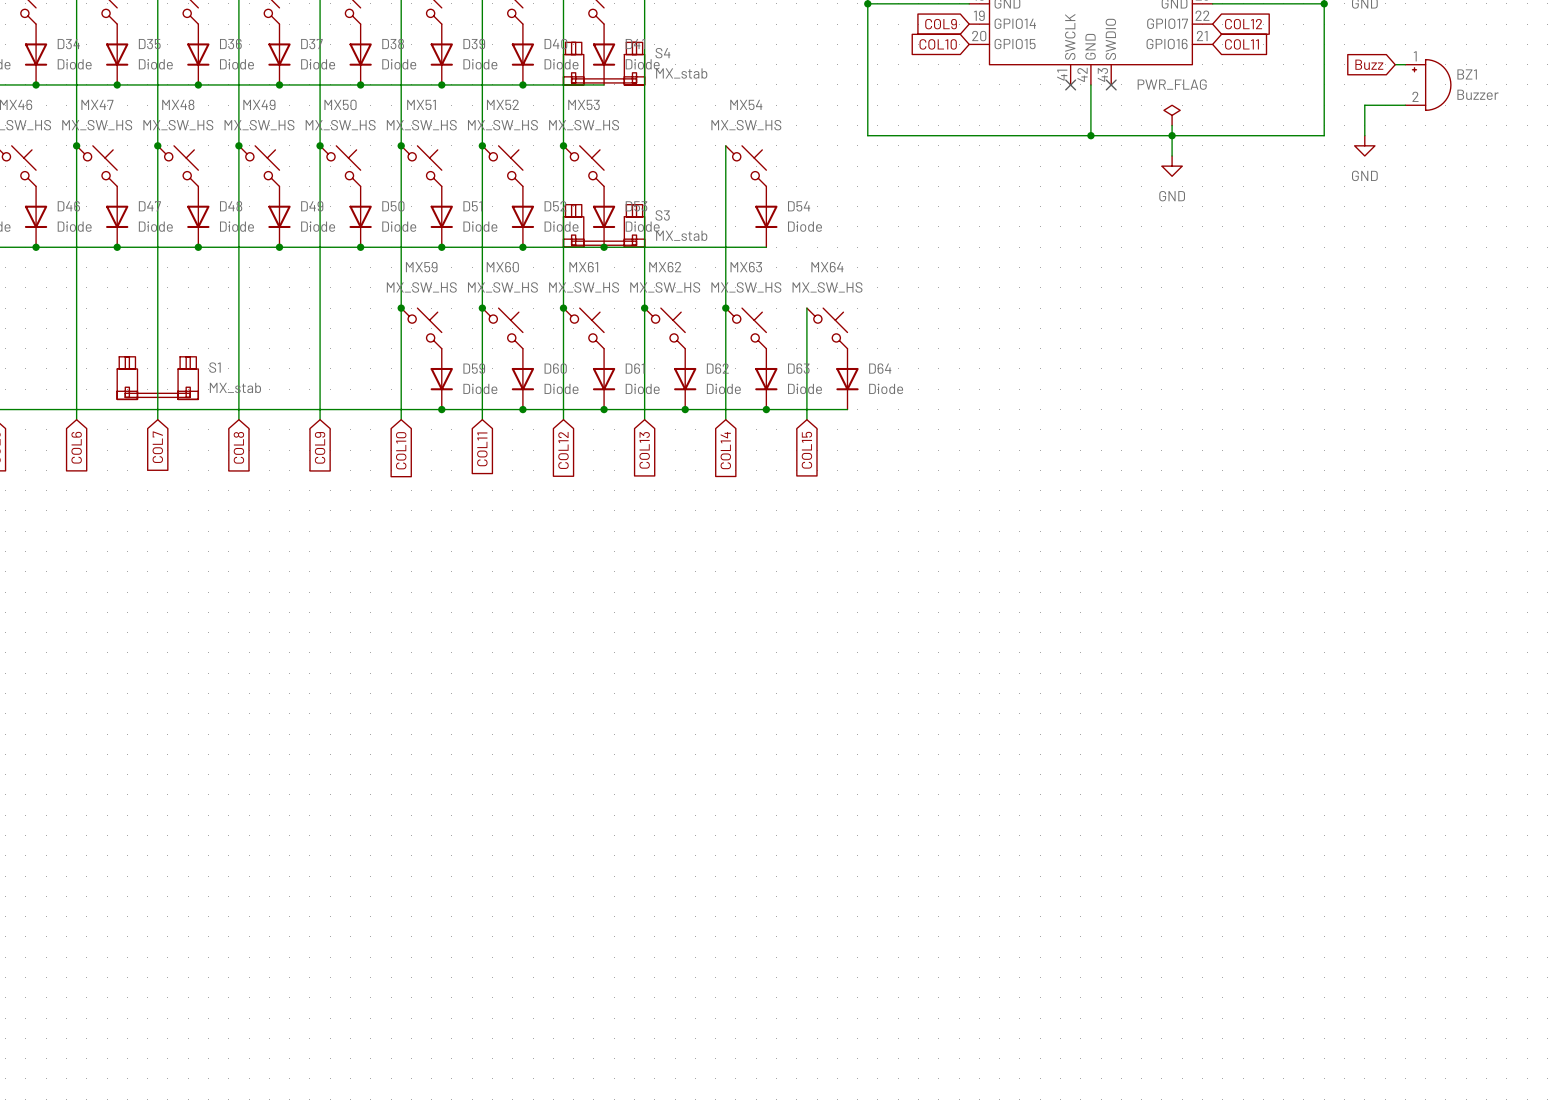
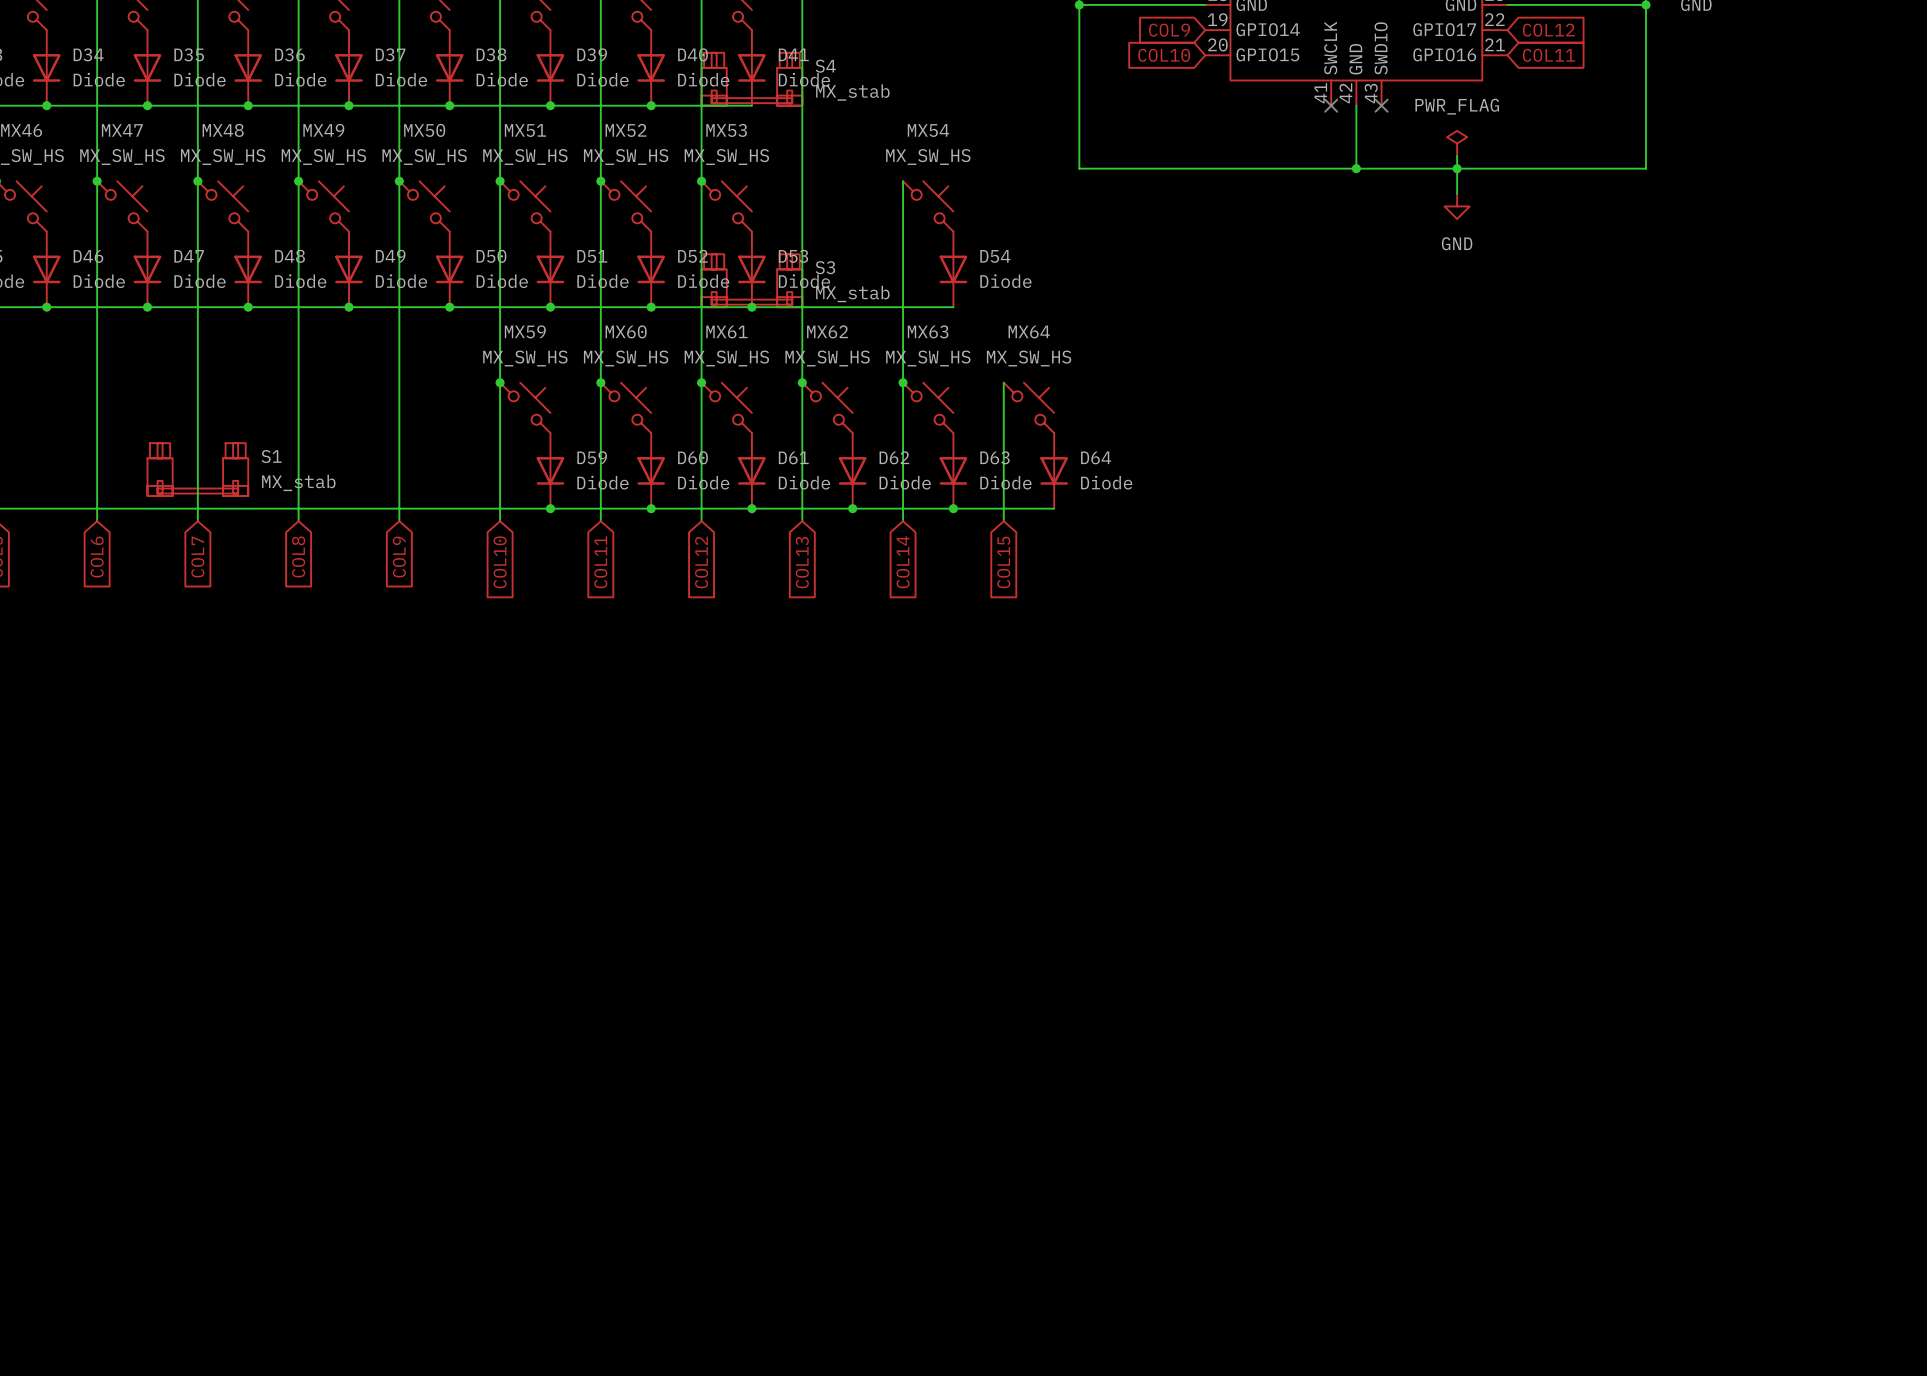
global label: Buzz (1369, 64) -> none
wire: (1395, 64) (1405, 64) -> none
BZ1: Buzzer (1428, 84) -> none
wire: (1405, 105) (1364, 105) (1364, 135) -> none
power symbol: GND (1364, 145) -> none

